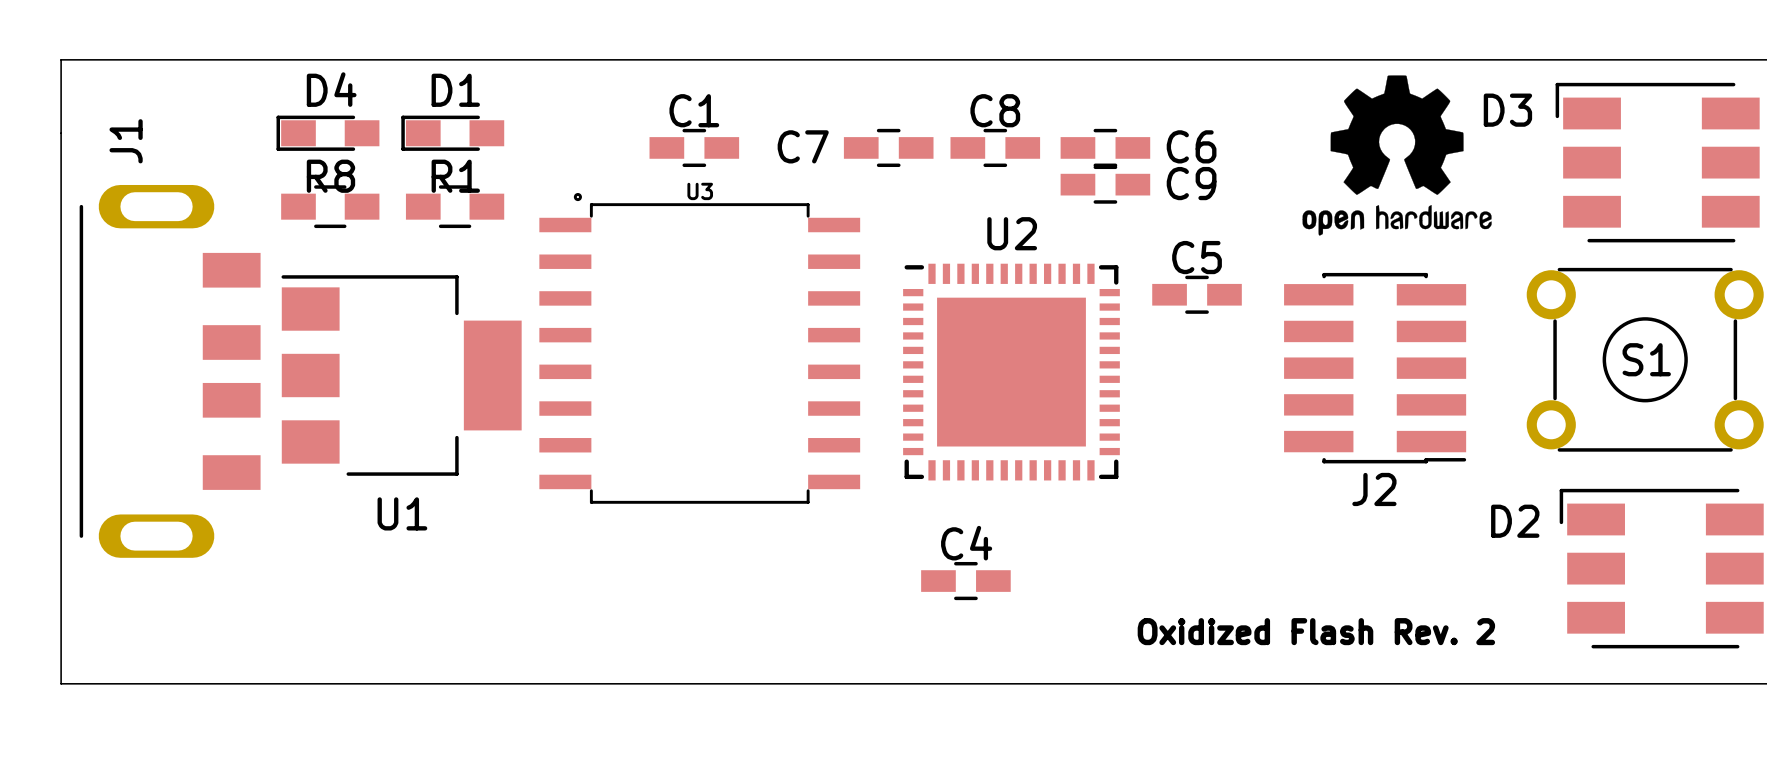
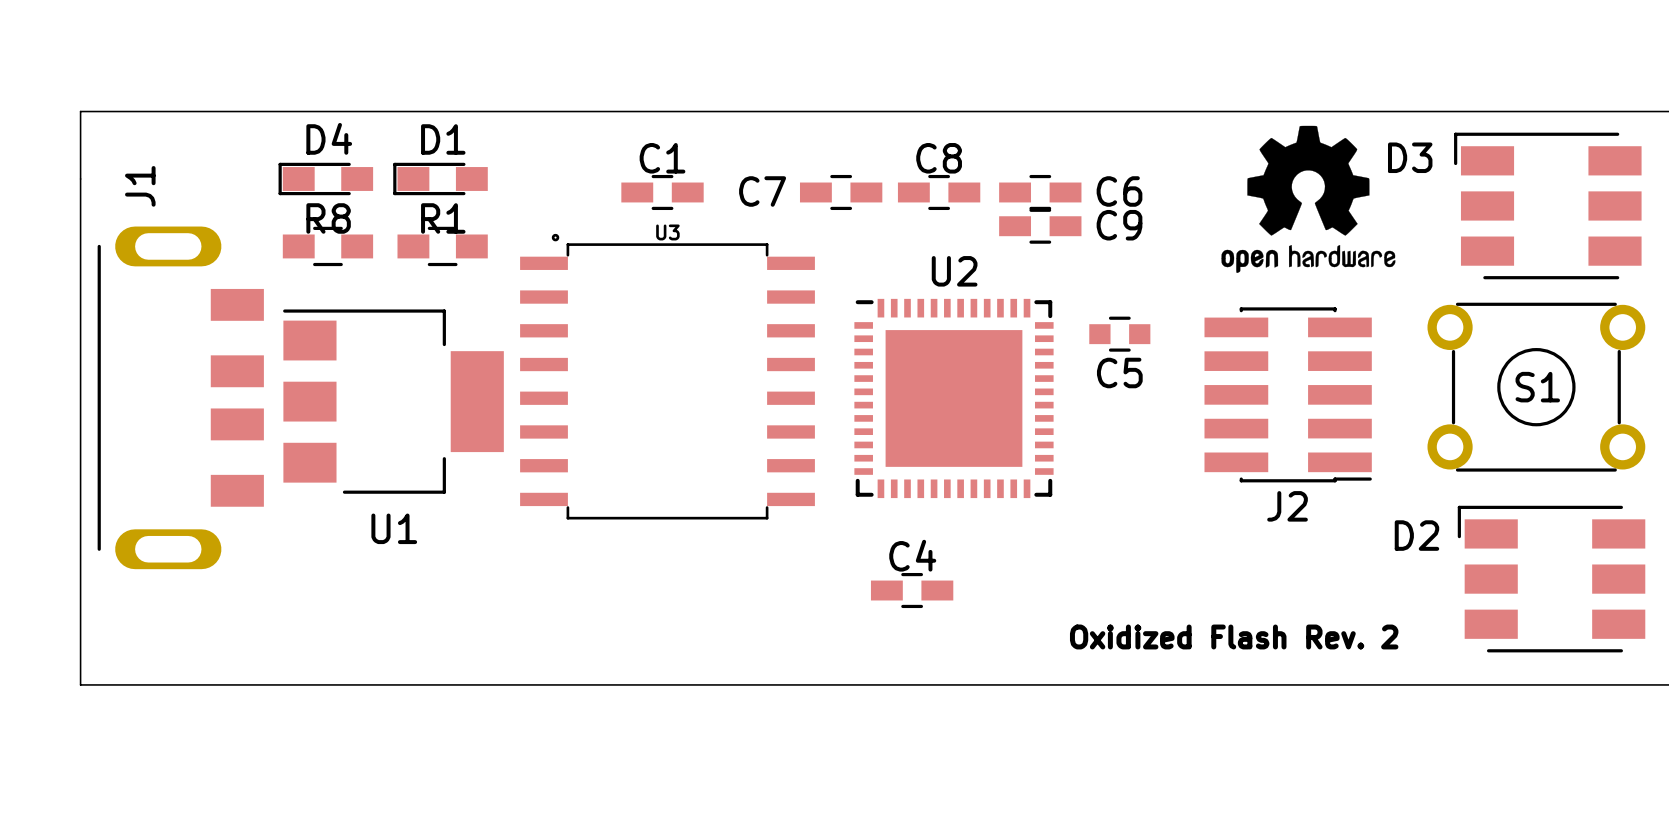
C5 name position: C5 (1197, 257) -> C5 (1119, 373)
C5 footprint: [1152, 275, 1242, 314] -> [1089, 316, 1151, 352]

